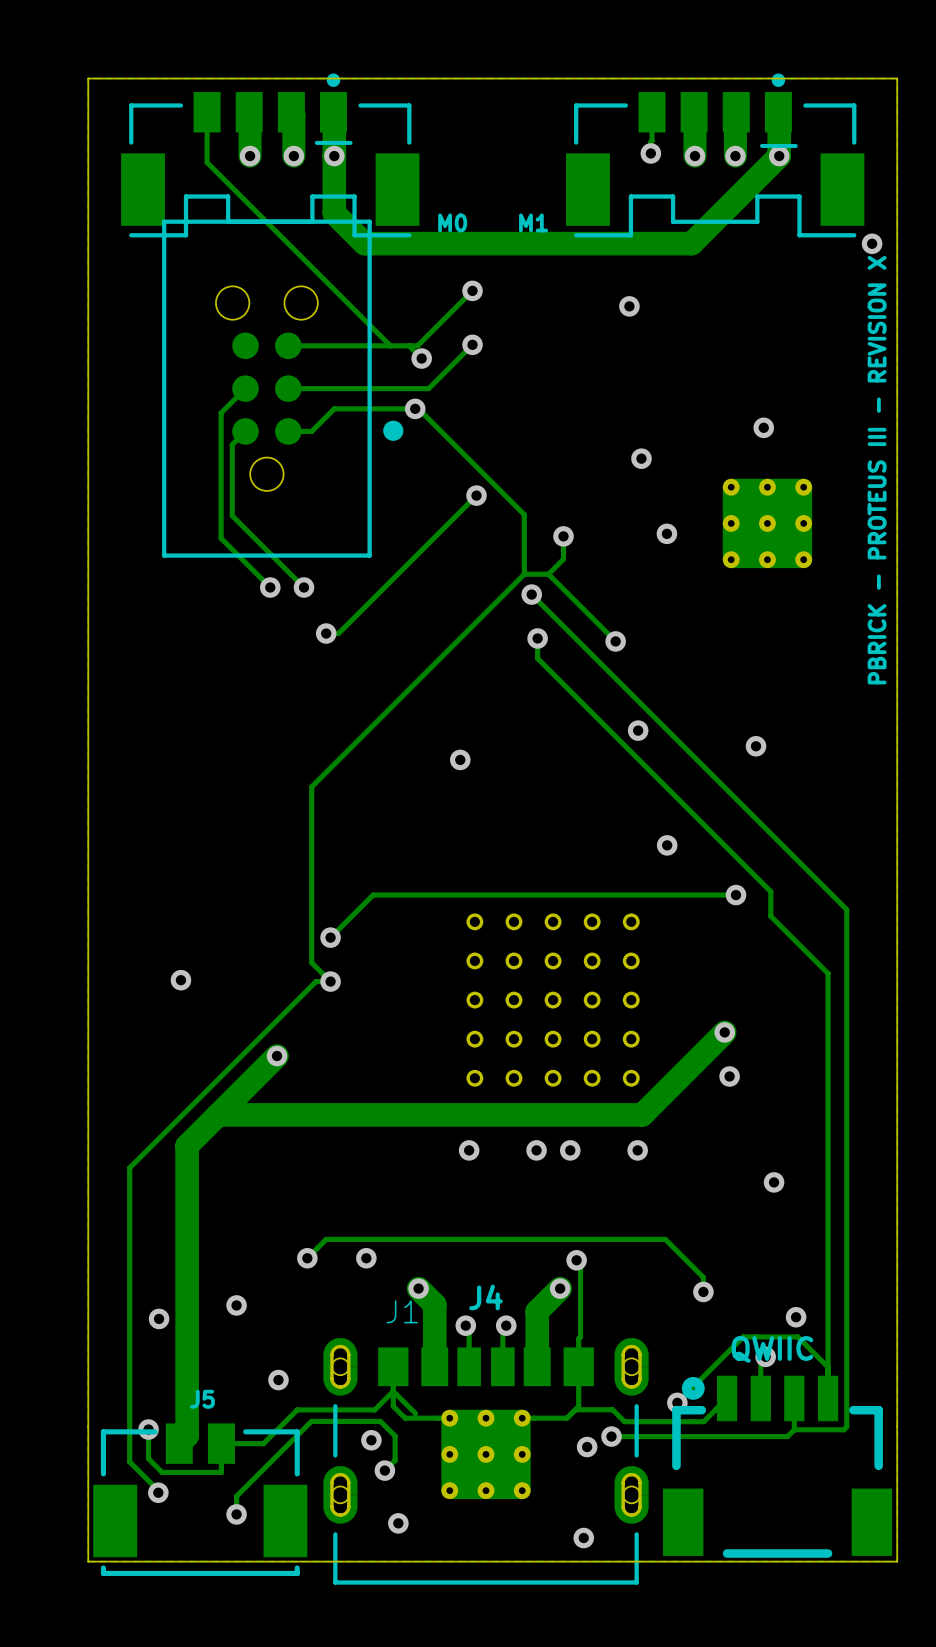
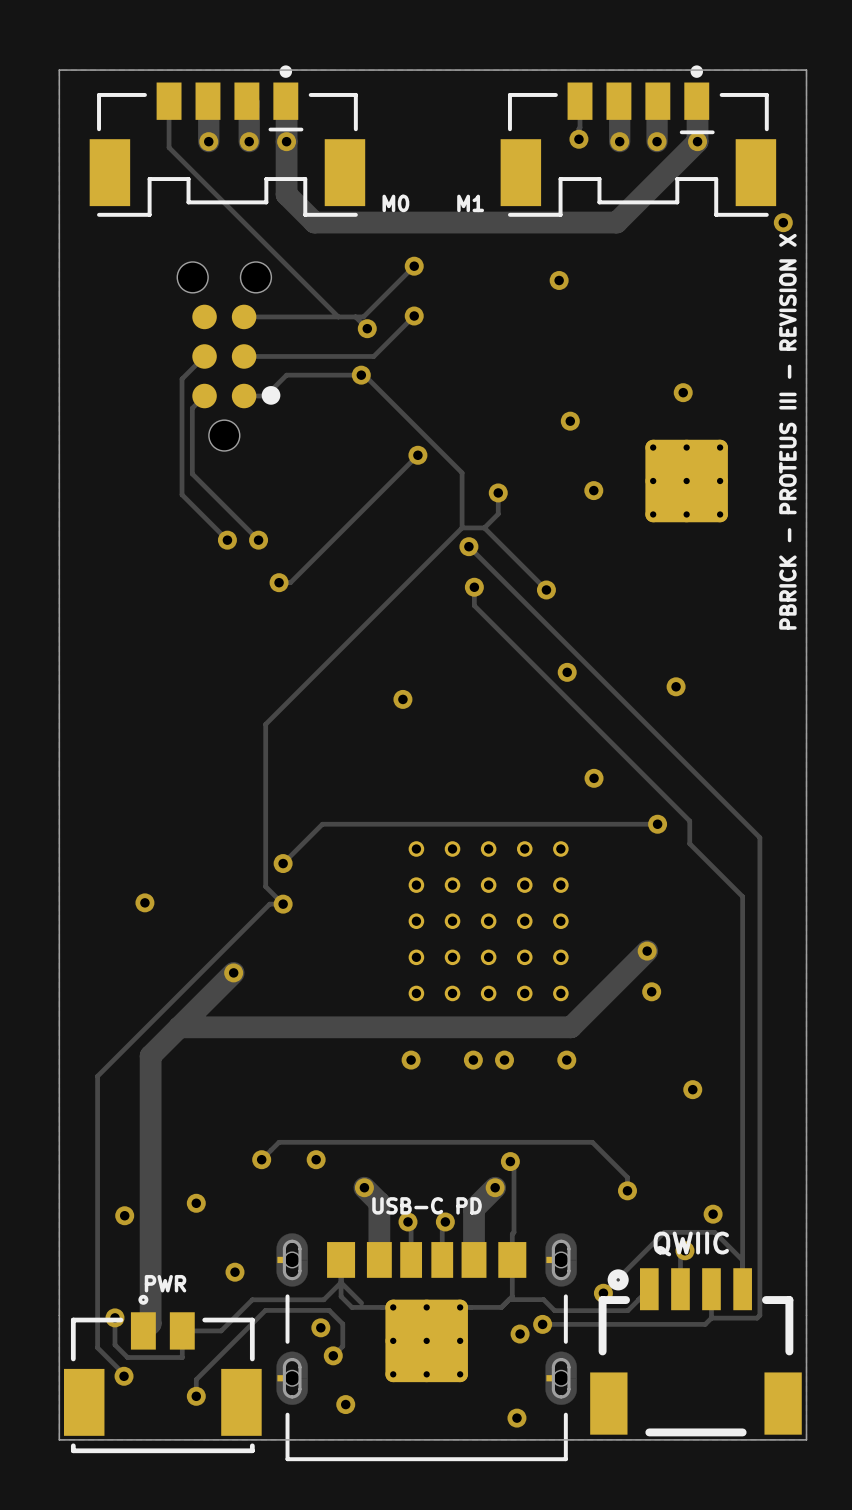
part footprint: [162, 219, 404, 558] -> [177, 261, 281, 451]
J4 name: J4 (486, 1297) -> none
J1 name: J1 (402, 1311) -> USB-C PD (427, 1205)
J5 name: J5 (202, 1399) -> PWR (165, 1283)
drawing: none -> [138, 1294, 149, 1305]

